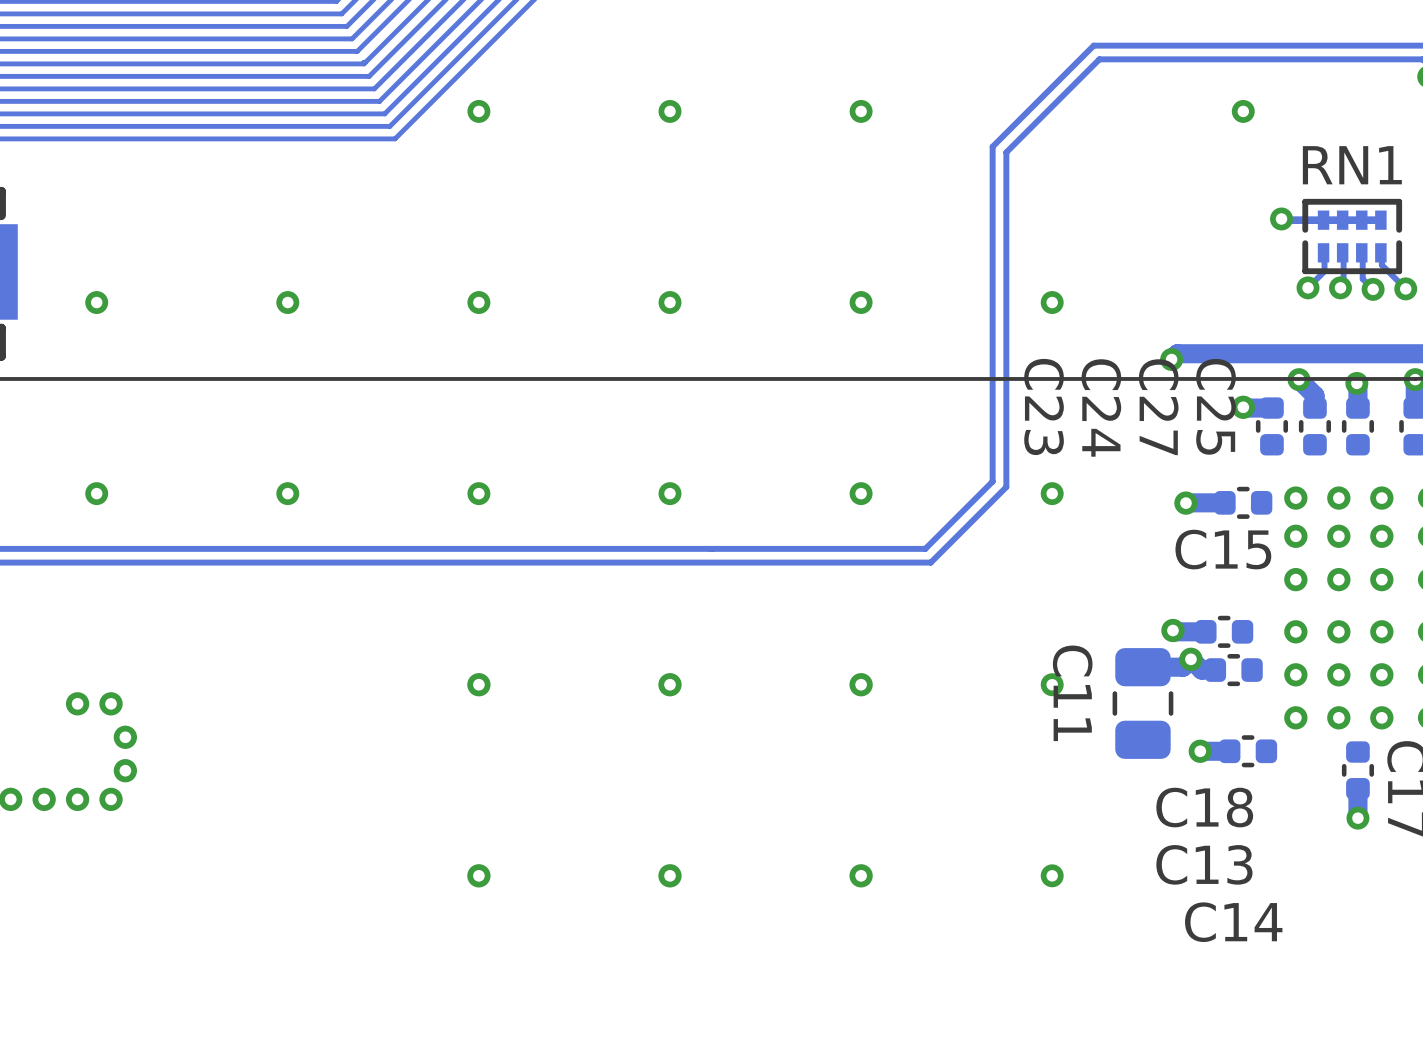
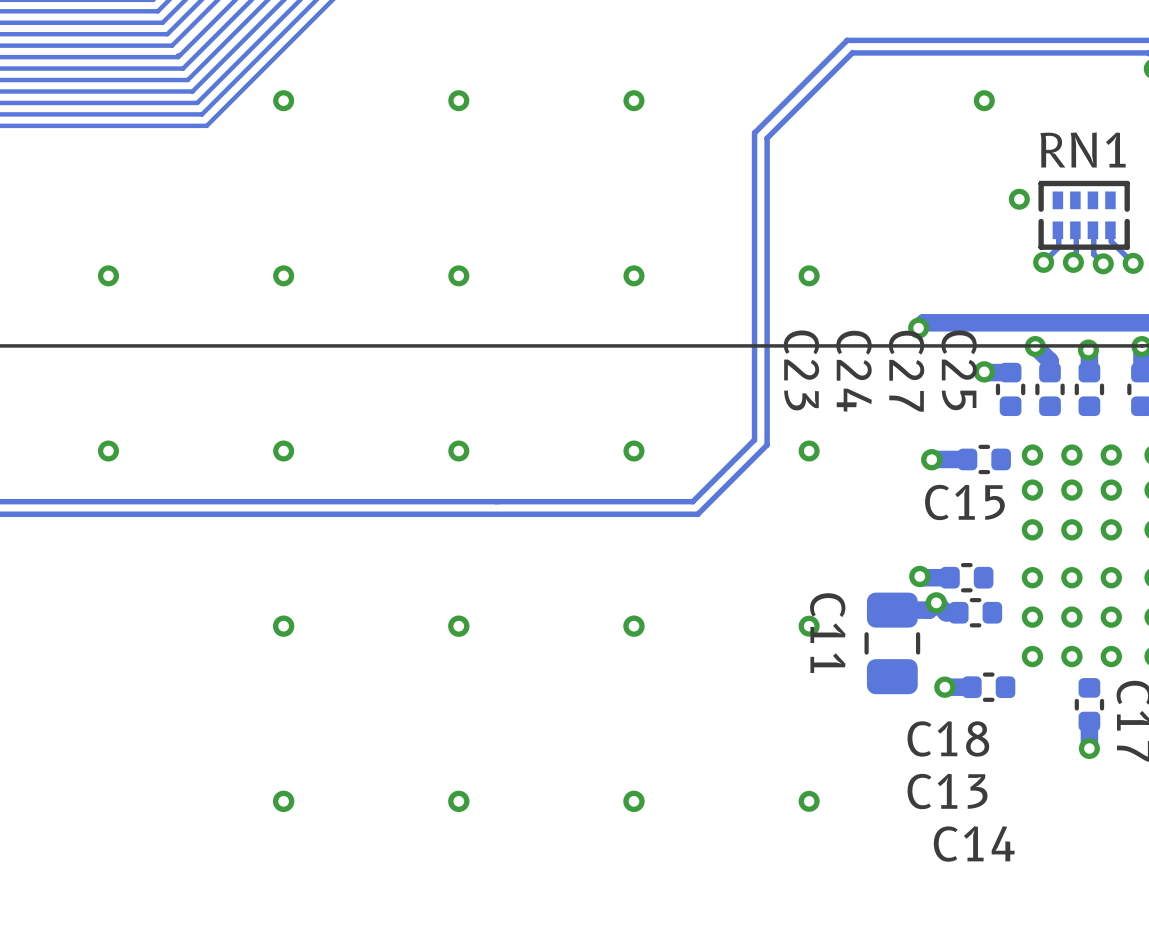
track: (1281, 218) (1380, 220) -> none

